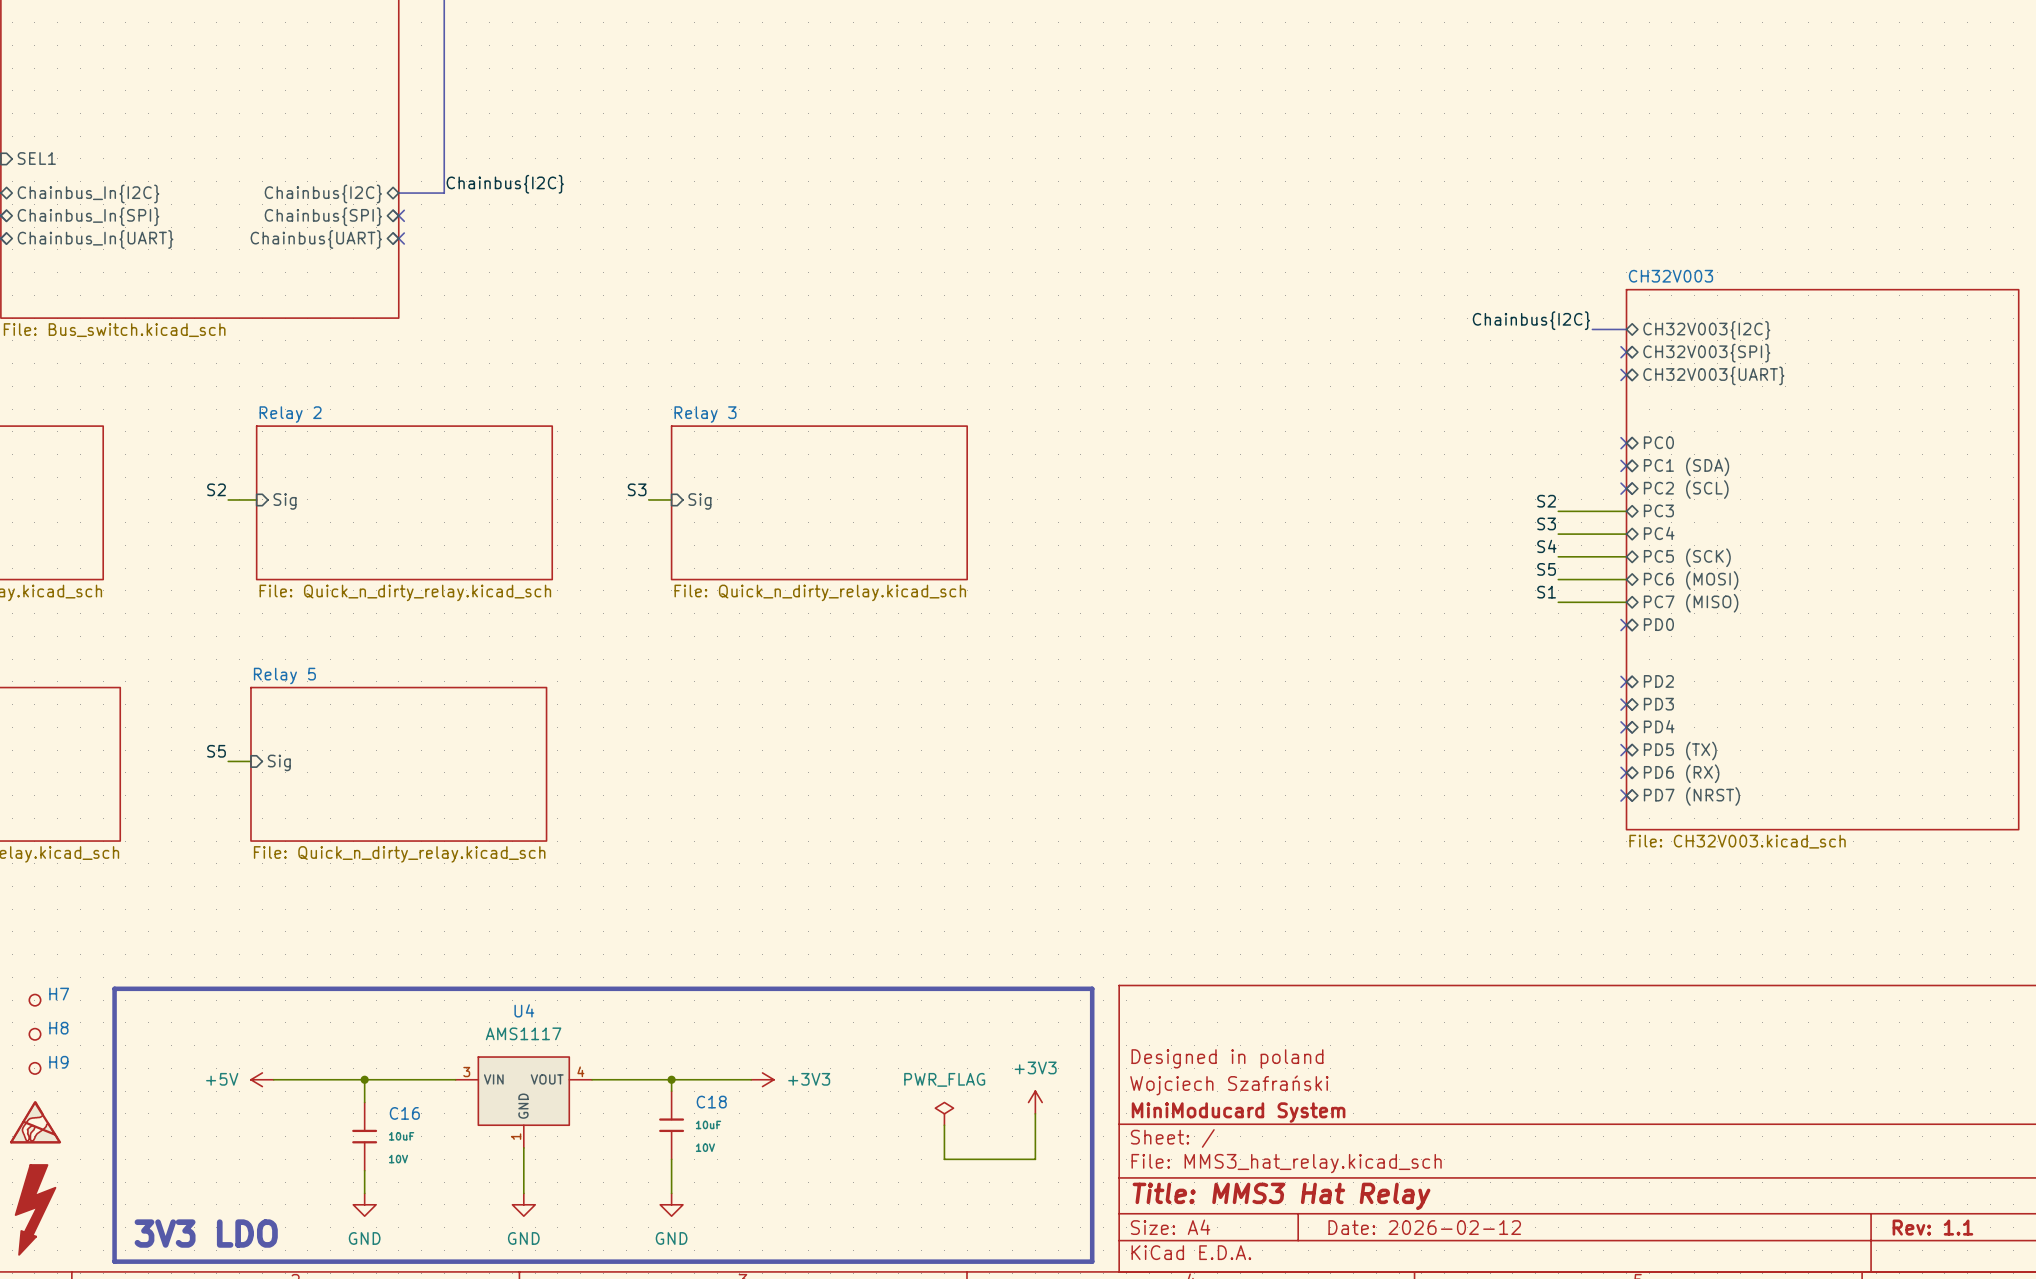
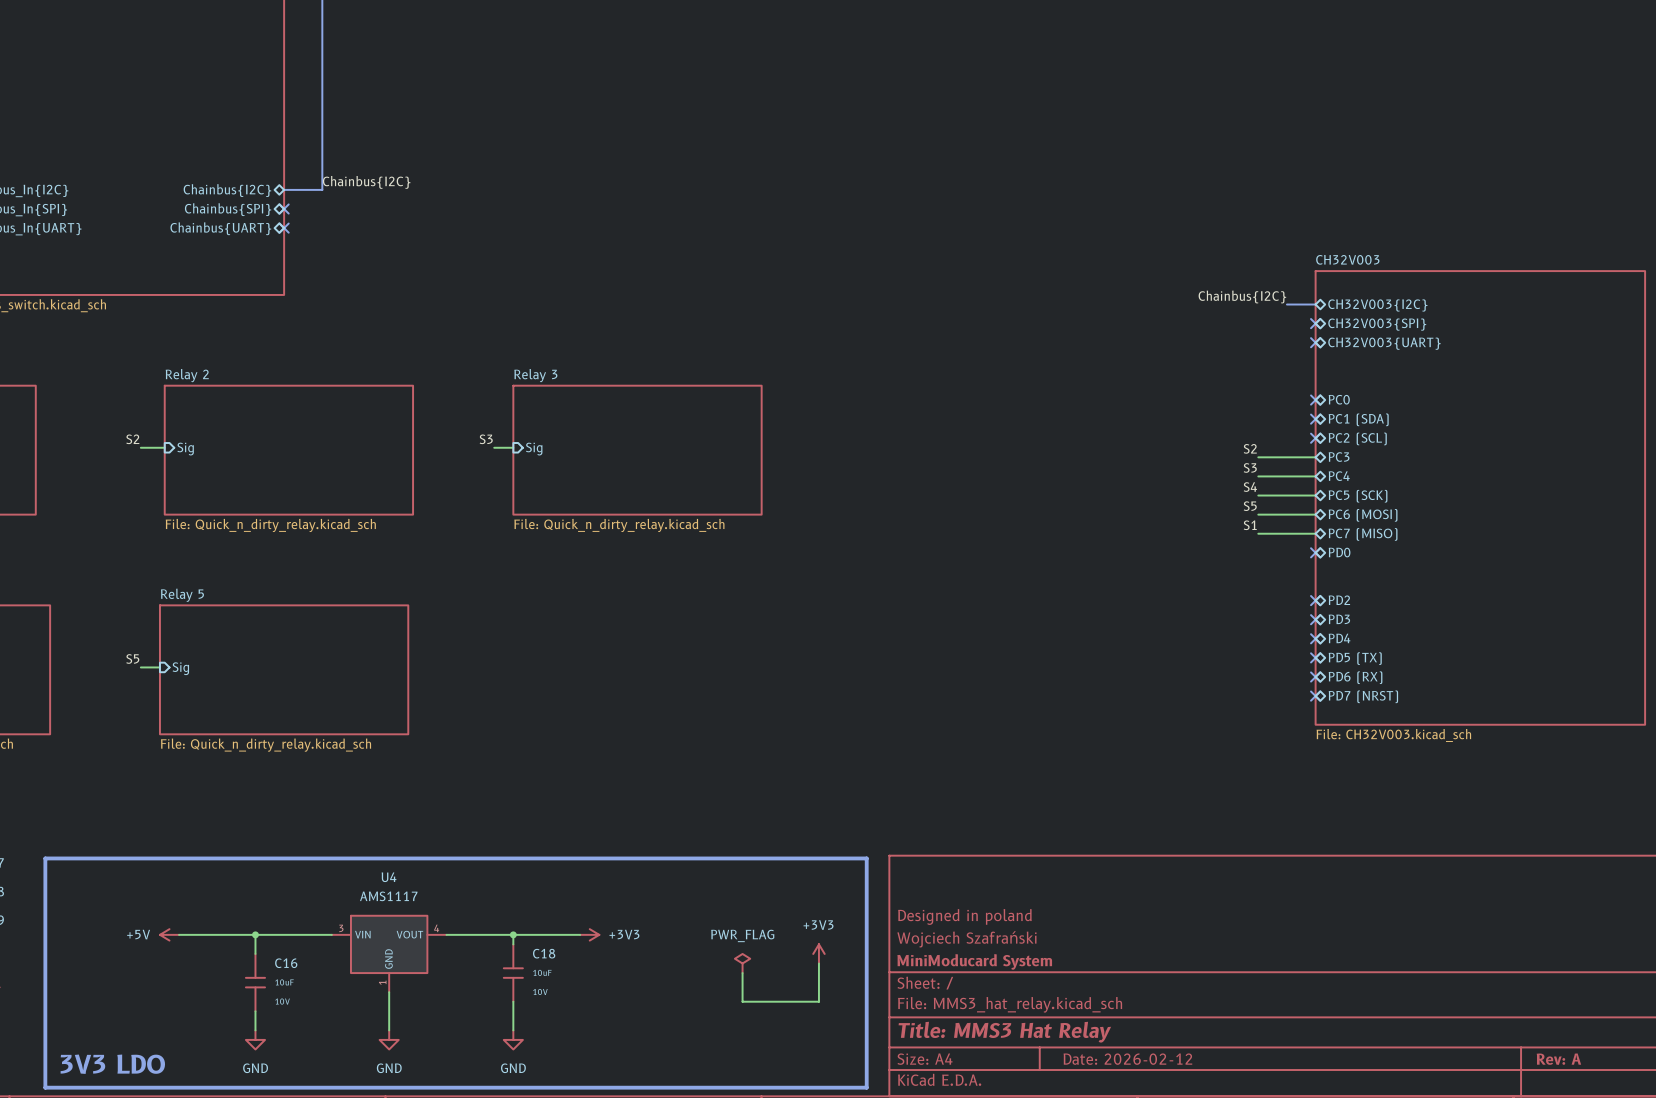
title block: Rev: 1.1 (1932, 1227) -> Rev: A (1558, 1059)

